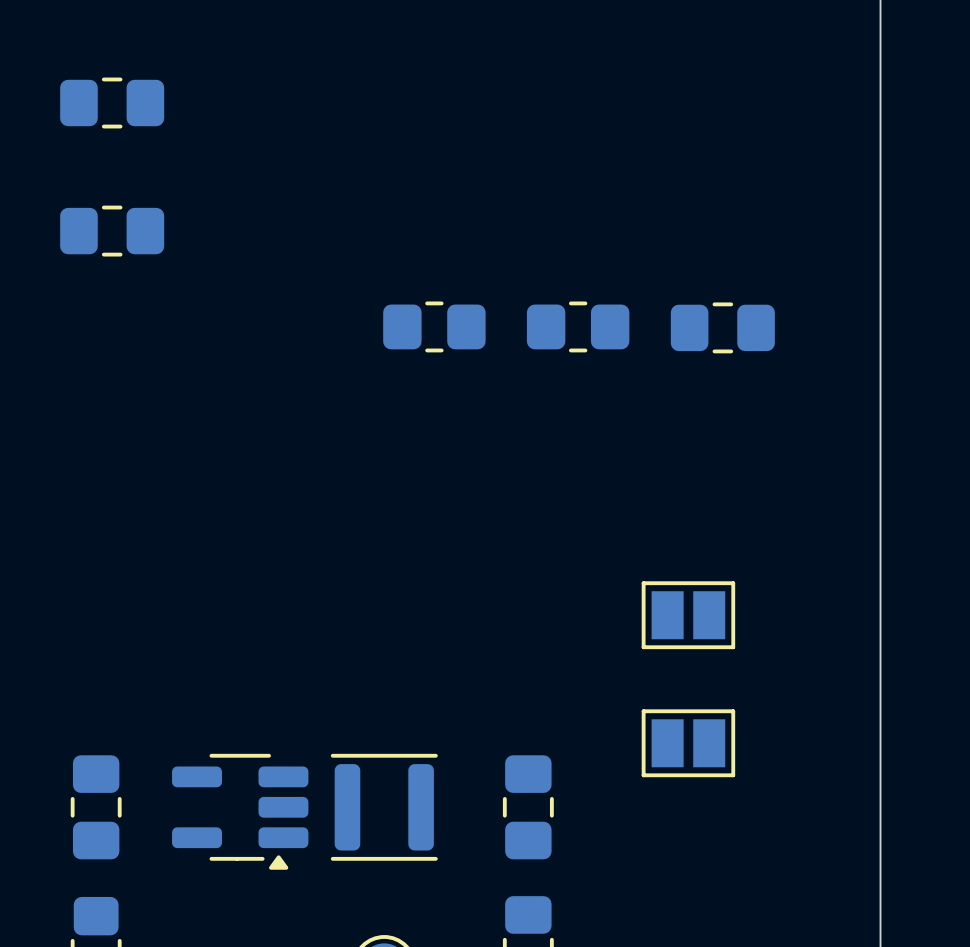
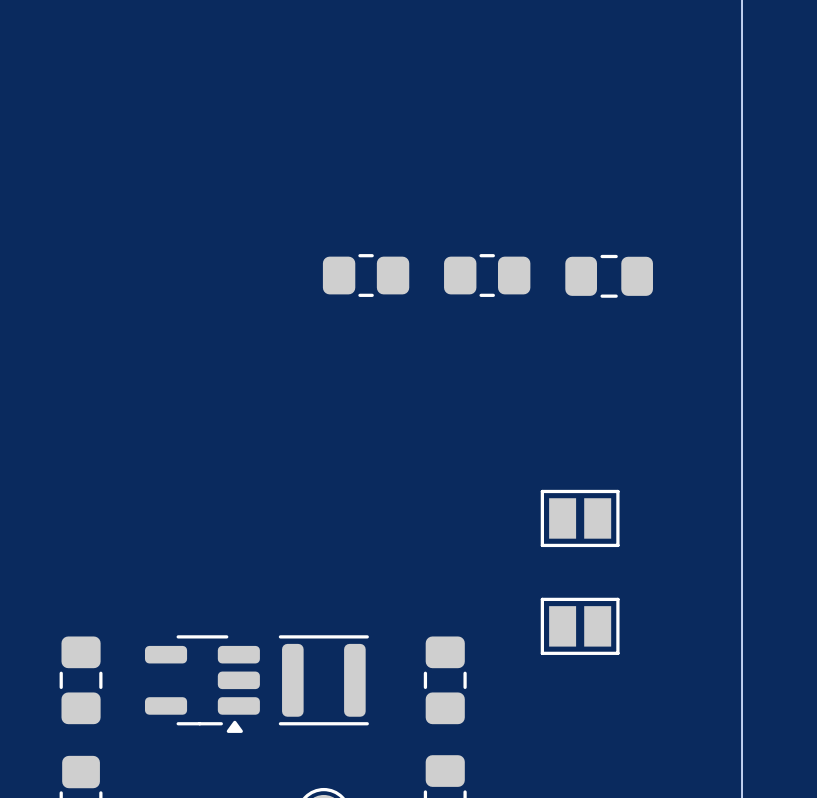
part: (112, 103) -> none
part: (112, 231) -> none

